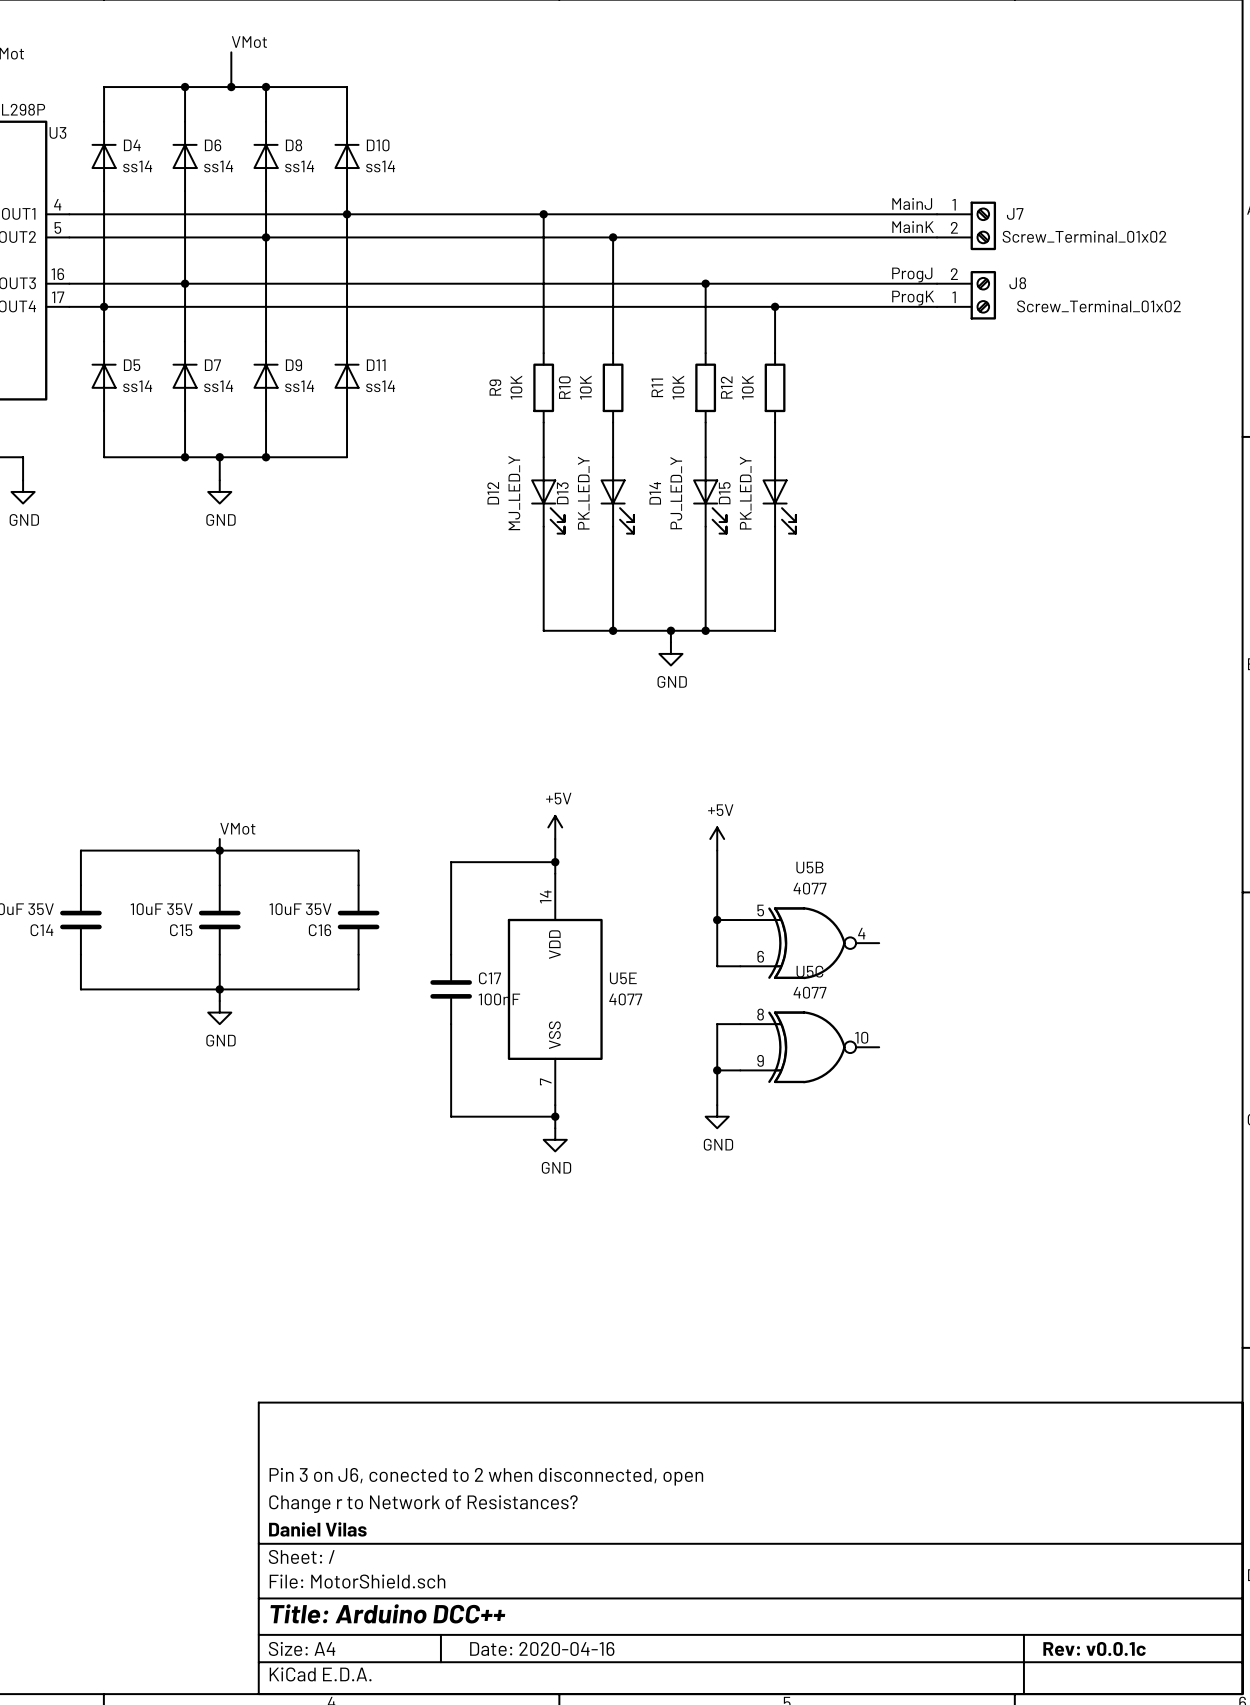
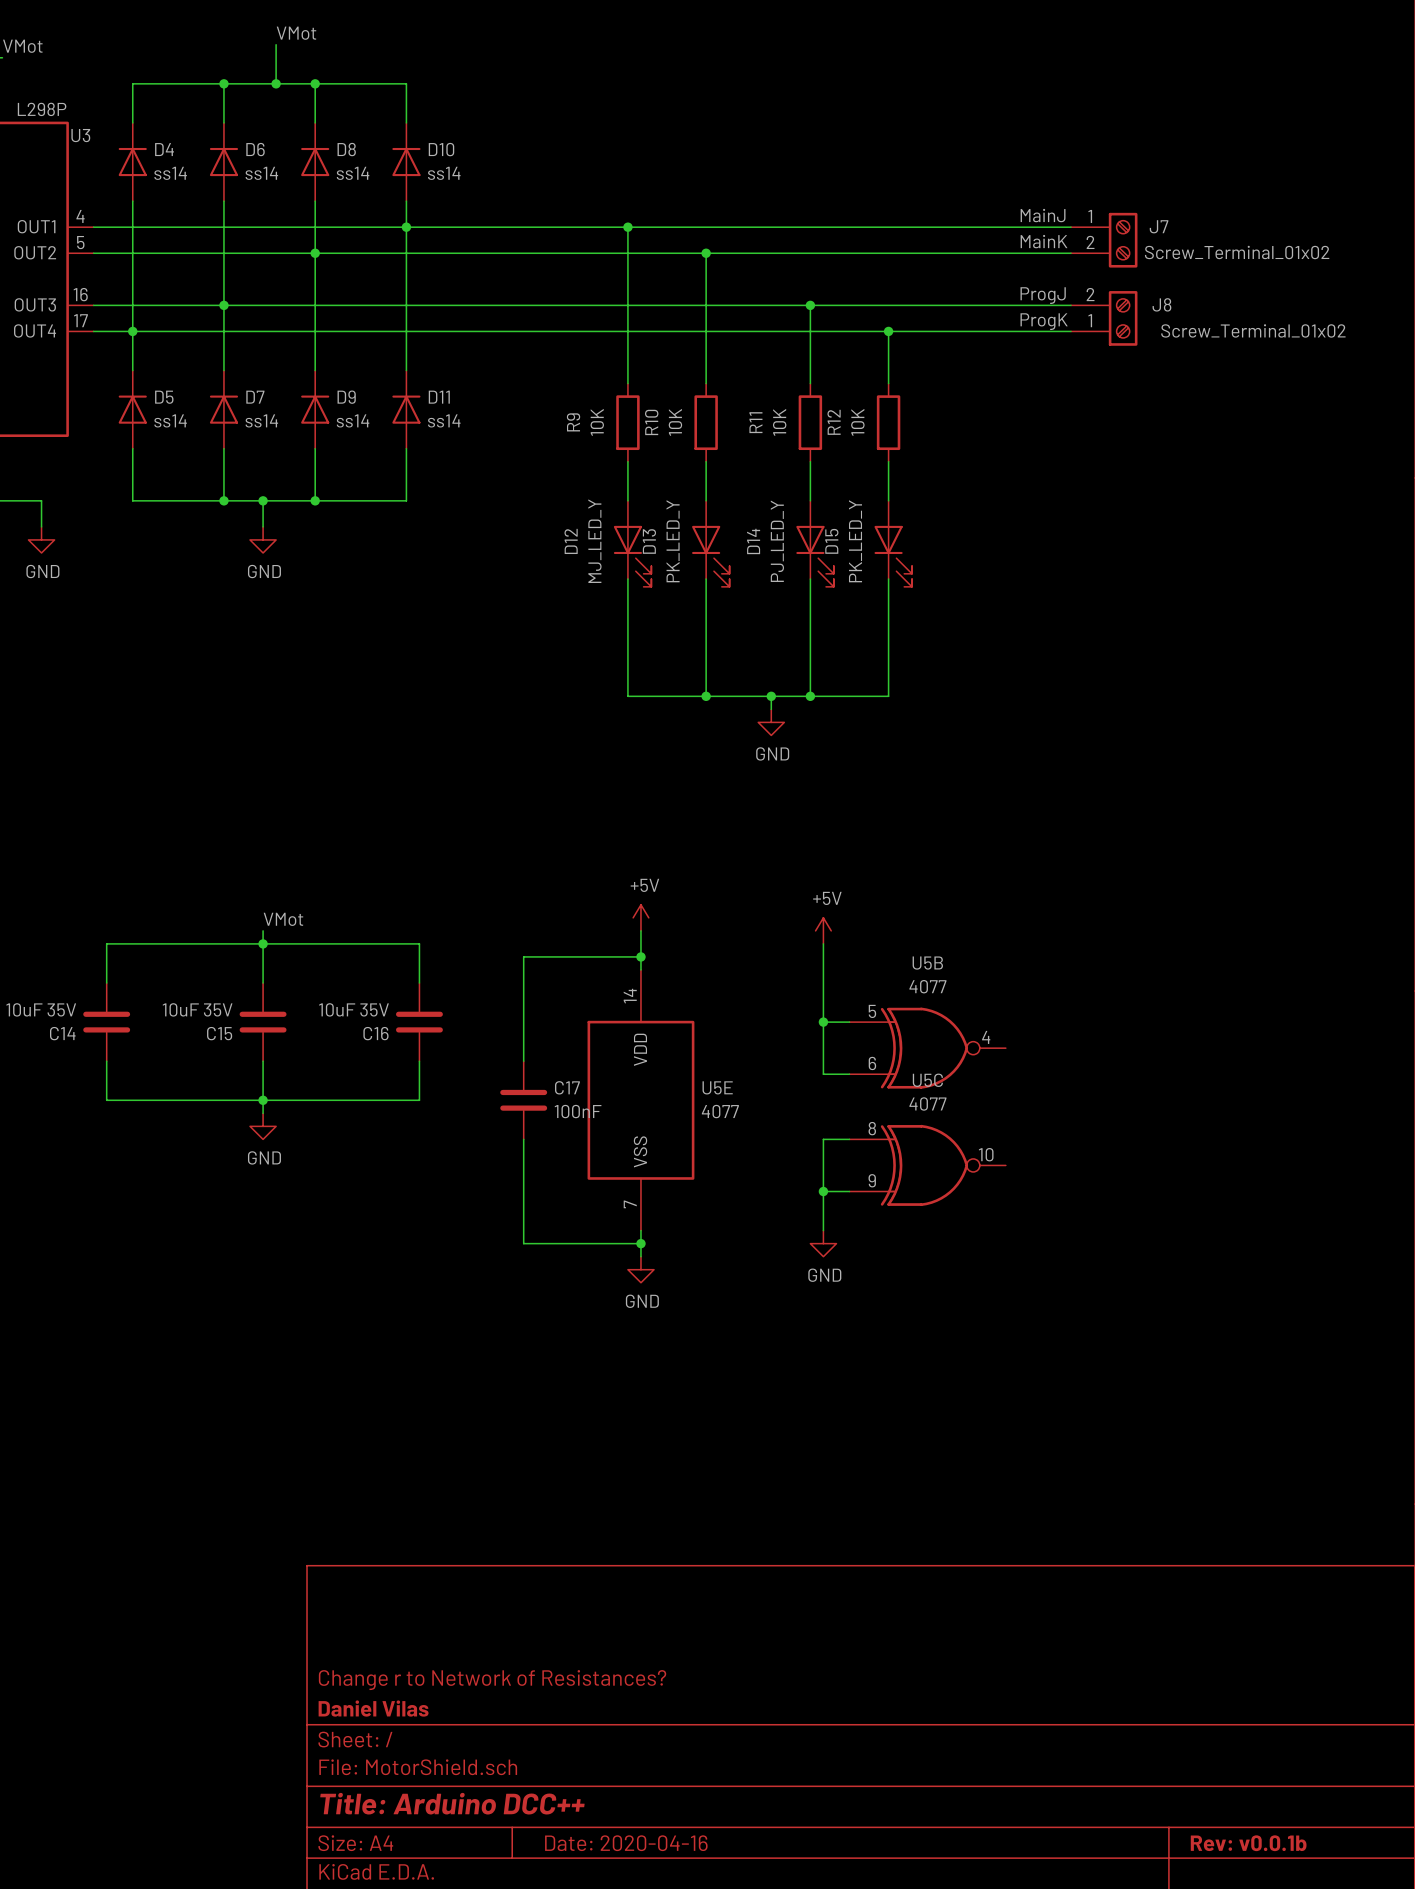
title block: Pin 3 on J6, conected to 2 when disconnected, open (486, 1476) -> none
title block: Rev: v0.0.1c (1094, 1648) -> Rev: v0.0.1b (1248, 1843)

